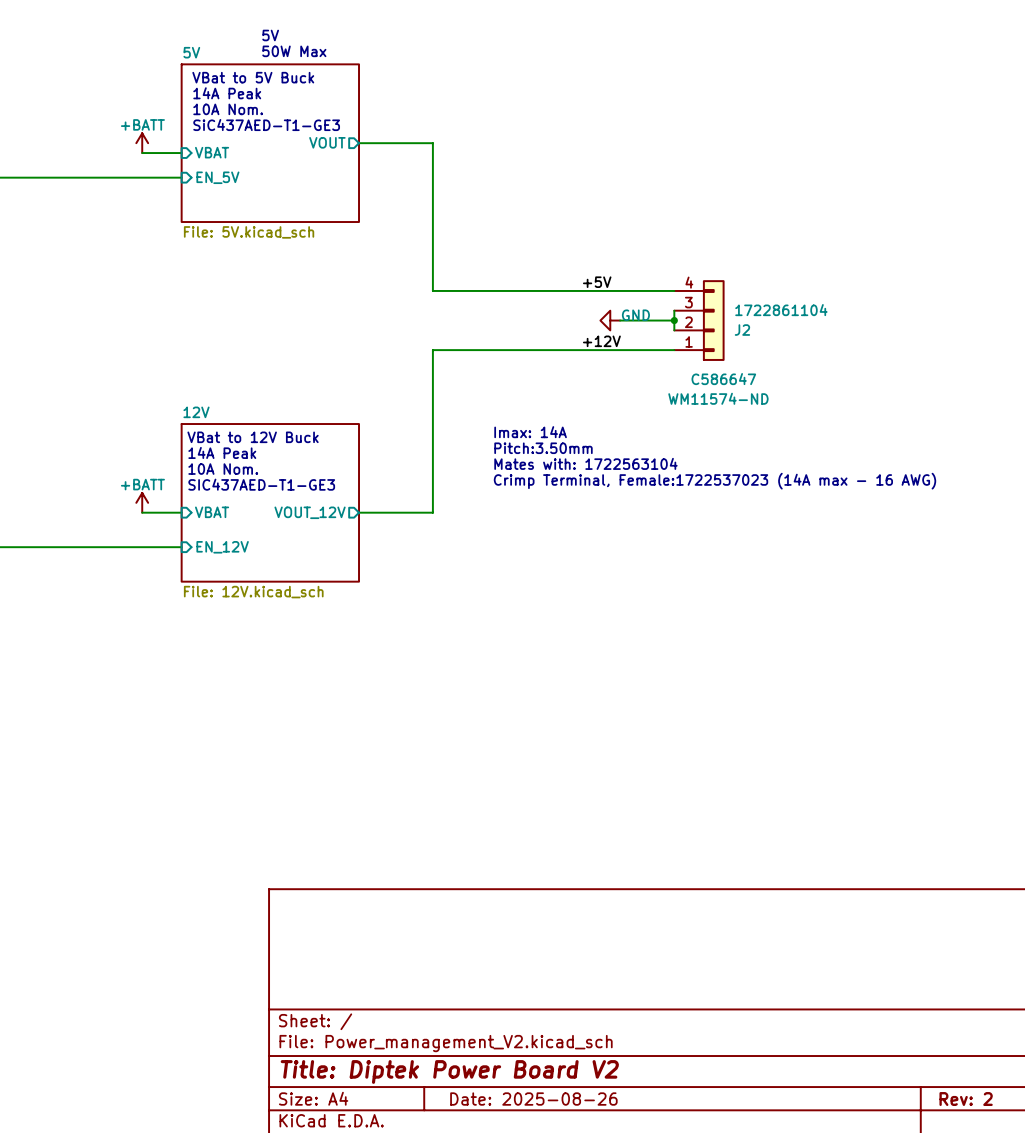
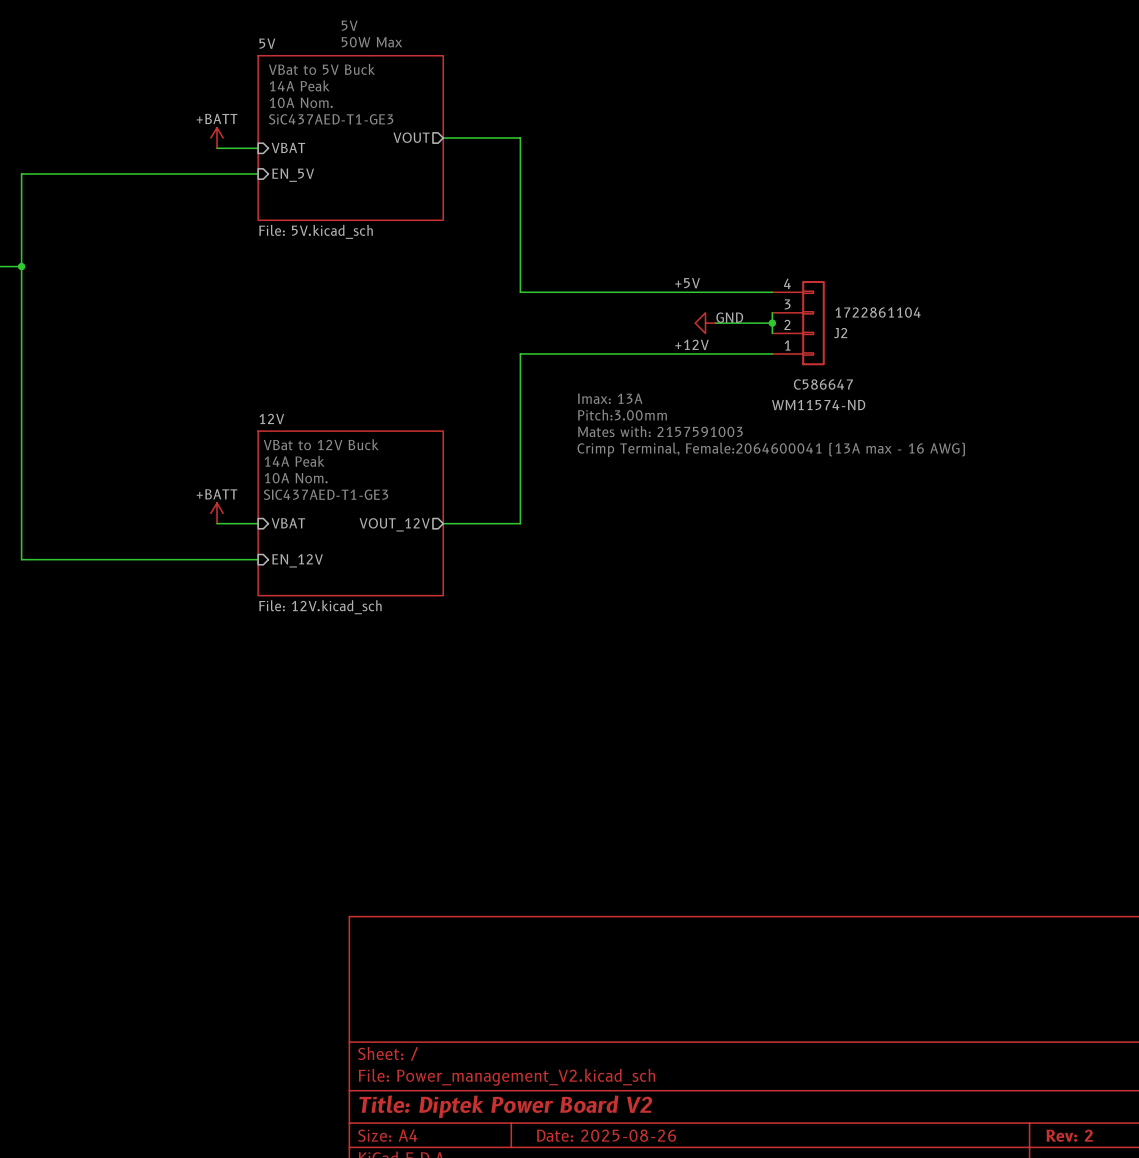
text: none -> Imax: 13A (610, 398)
text: none -> Pitch:3.00mm (622, 415)
text: none -> Mates with: 2157591003 (660, 431)
text: Imax: 14A (530, 432) -> none
text: none -> Crimp Terminal, Female:2064600041 (13A max - 16 AWG) (771, 449)
text: Pitch:3.50mm (543, 448) -> none
text: Mates with: 1722563104 (585, 463) -> none
text: Crimp Terminal, Female:1722537023 (14A max - 16 AWG) (714, 481) -> none

